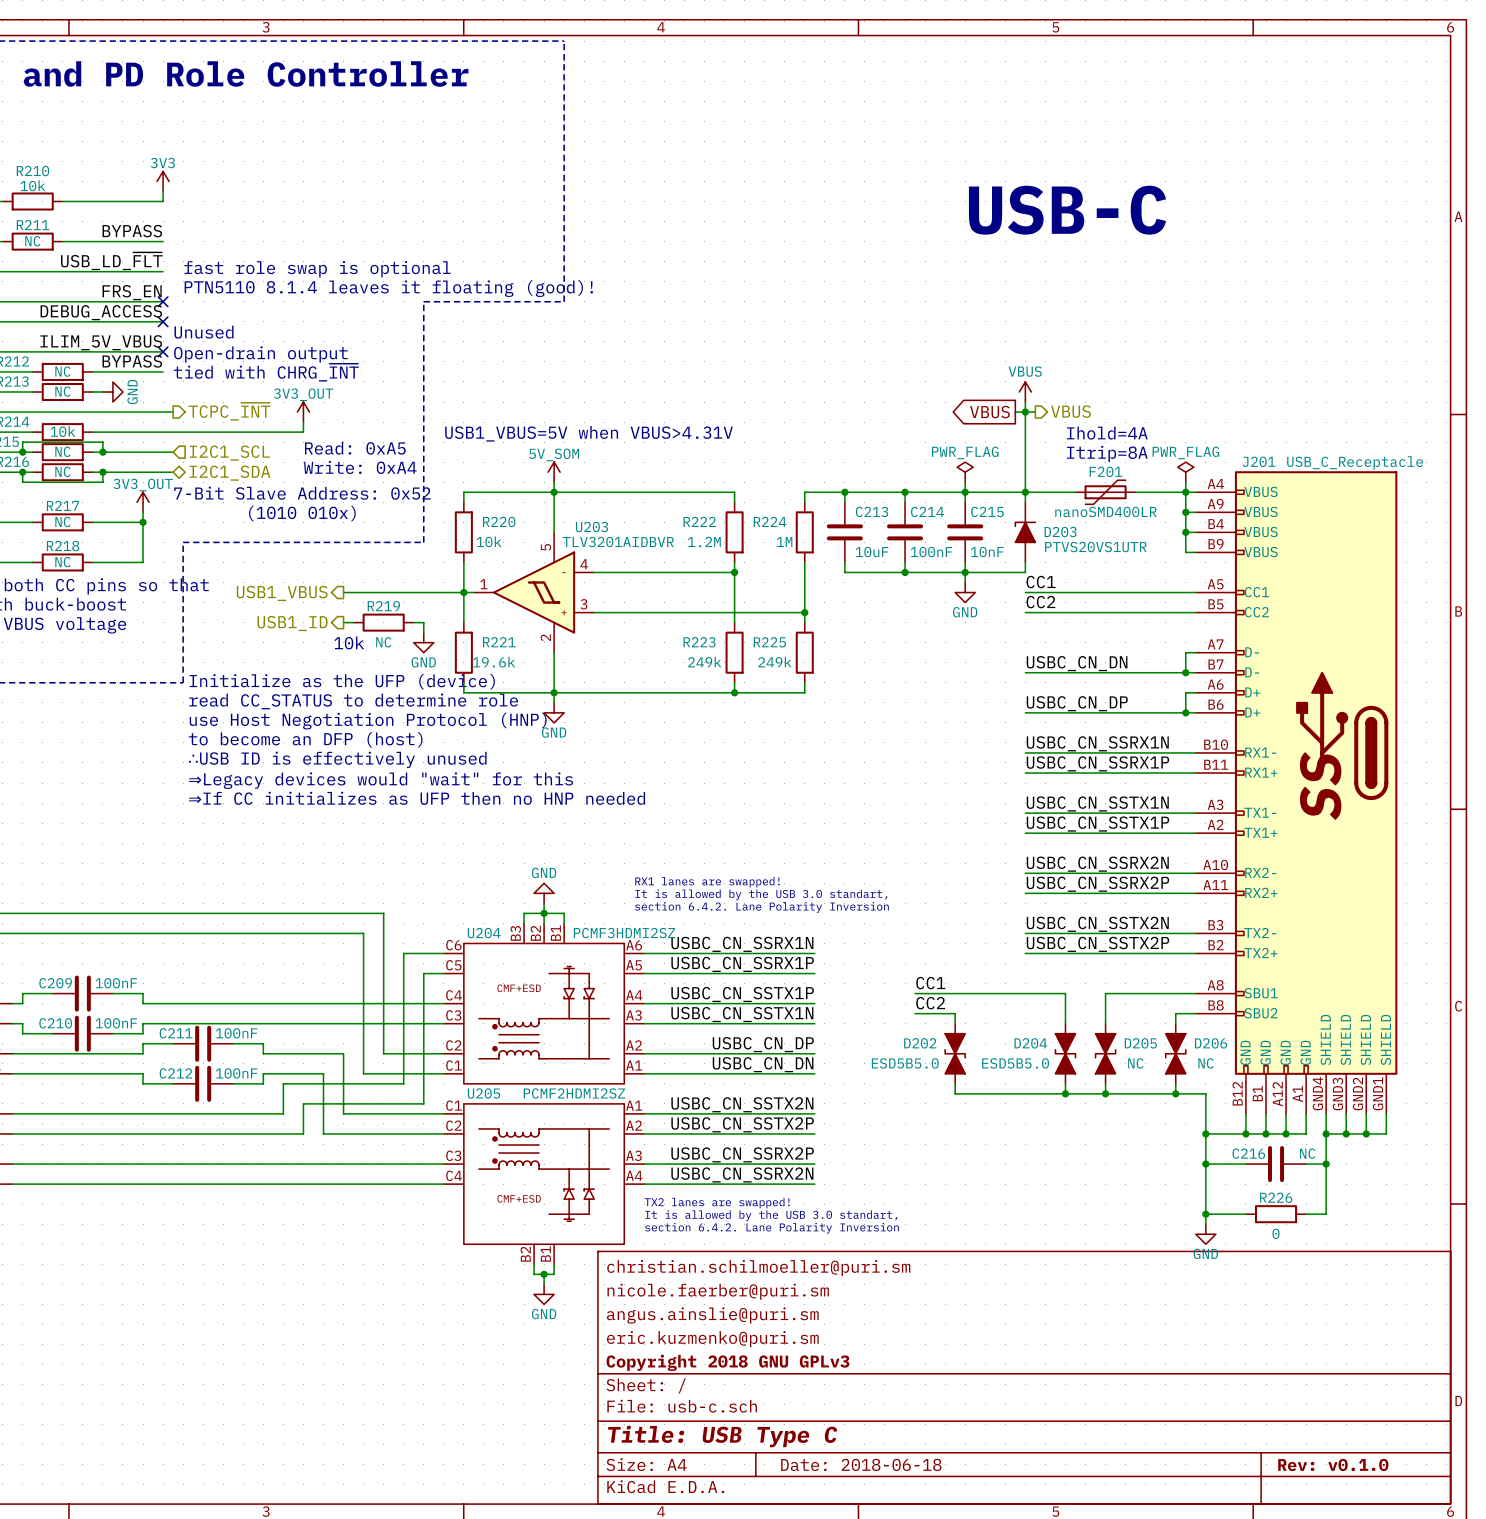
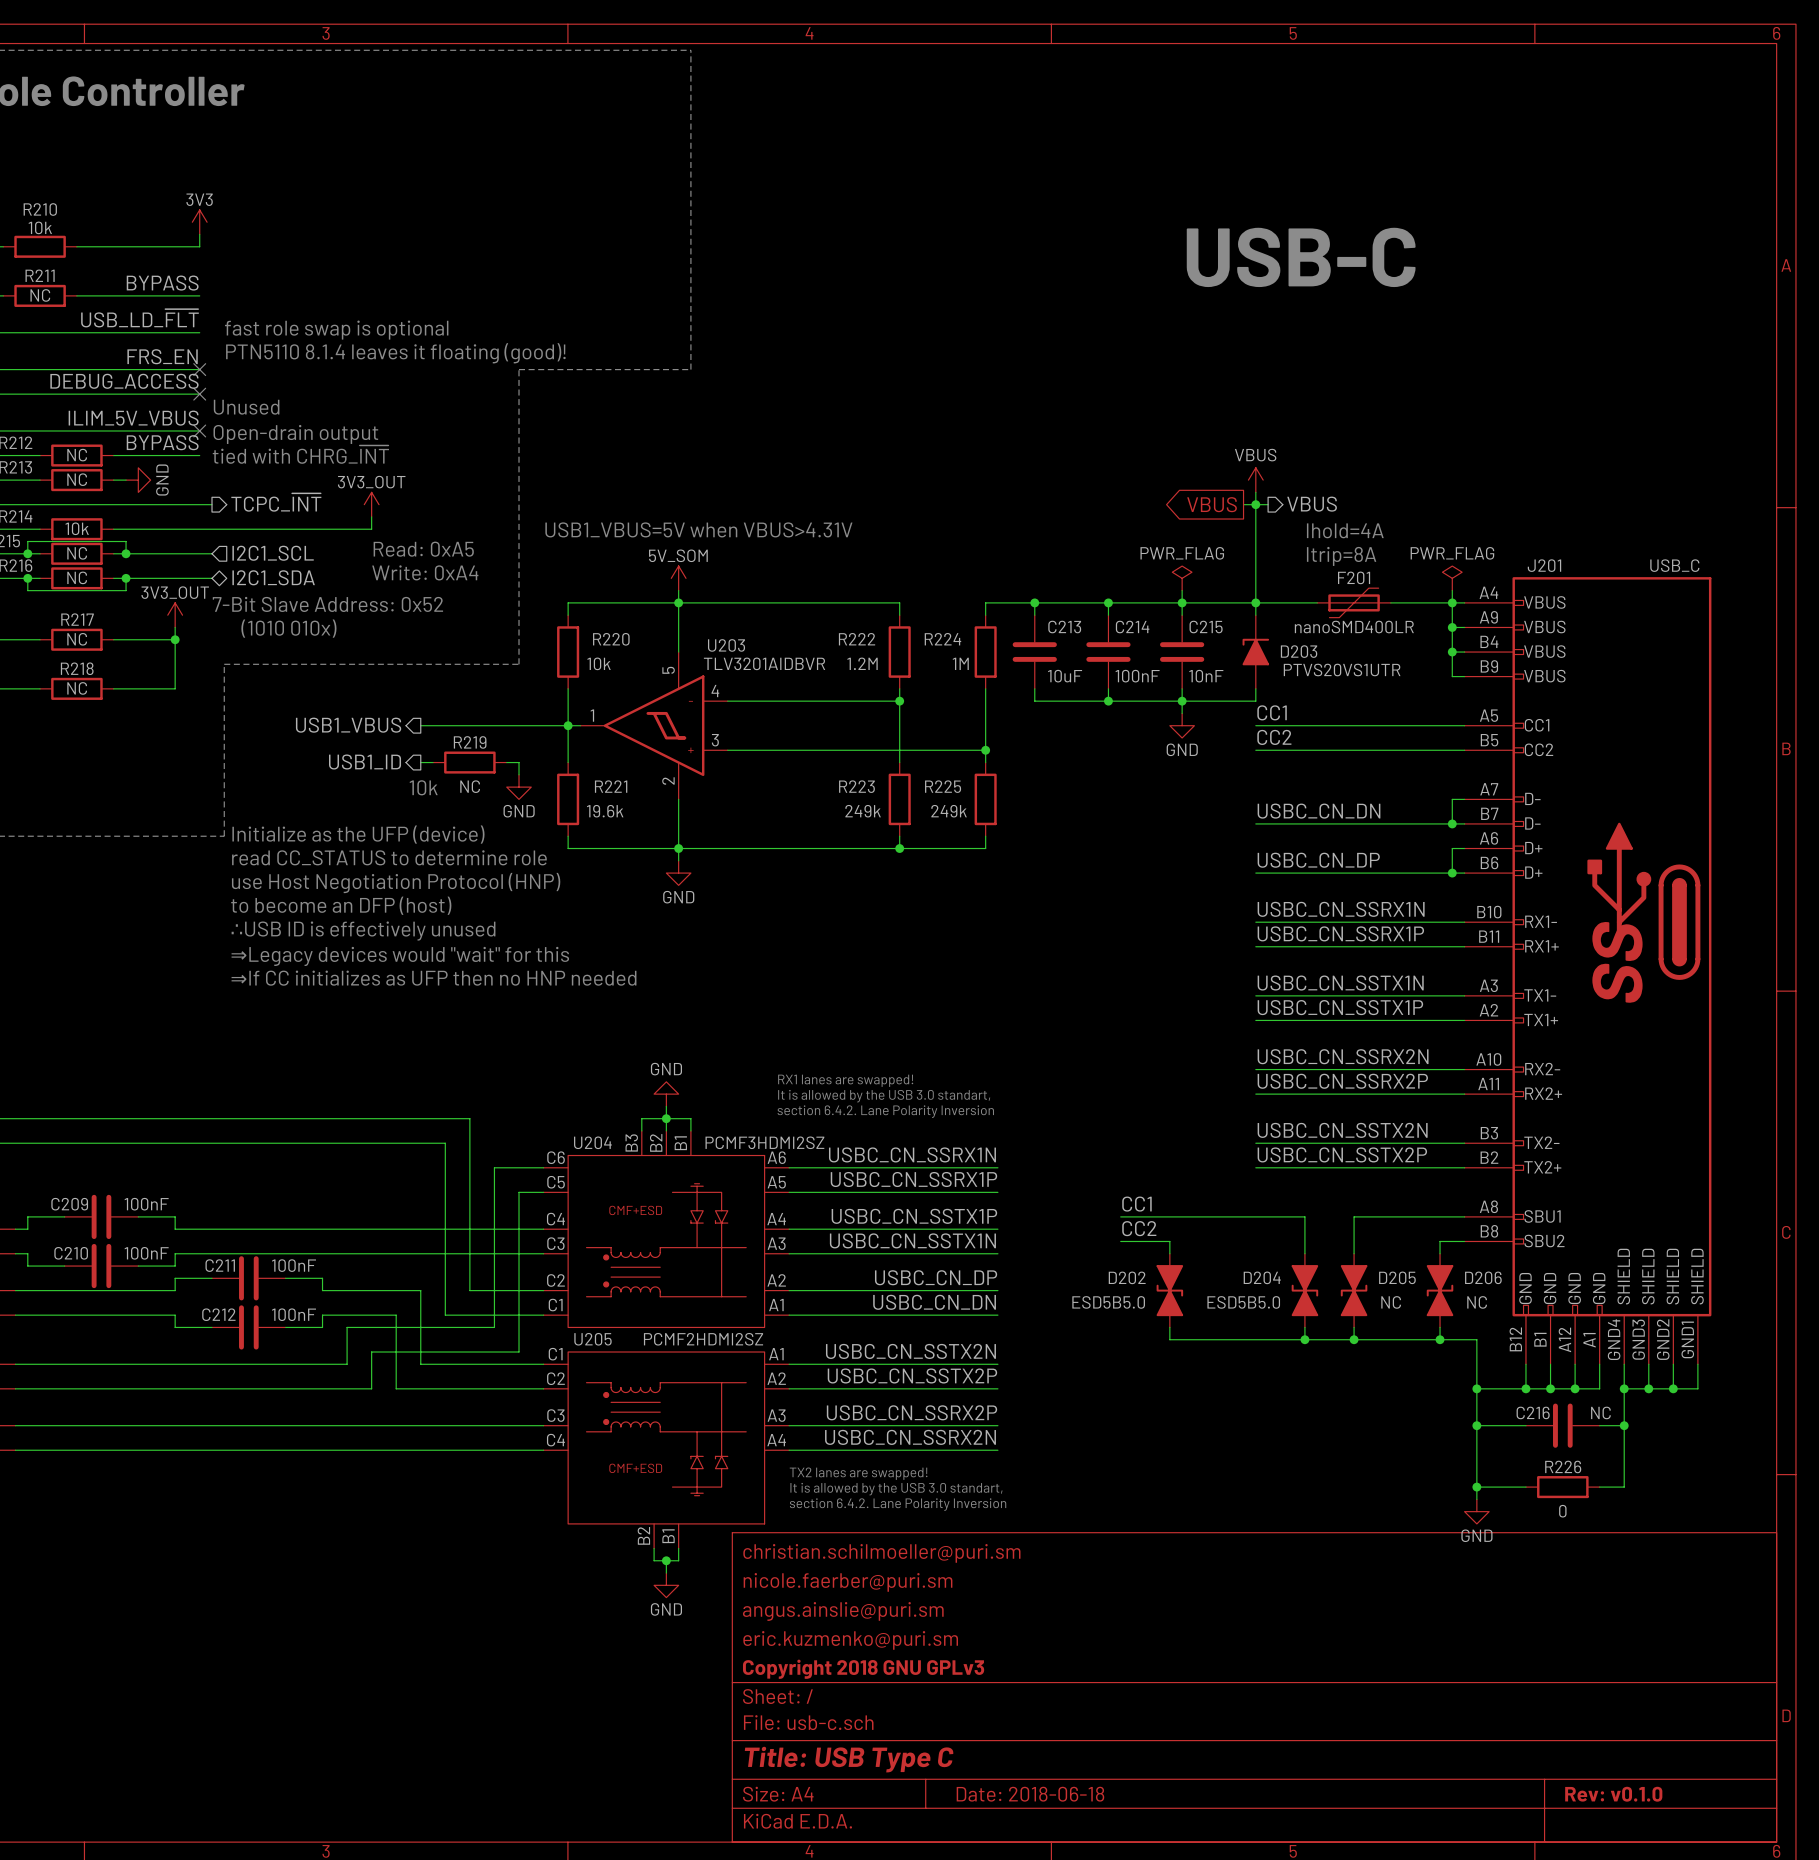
J201 value: USB_C_Receptacle (1355, 462) -> USB_C (1674, 565)

